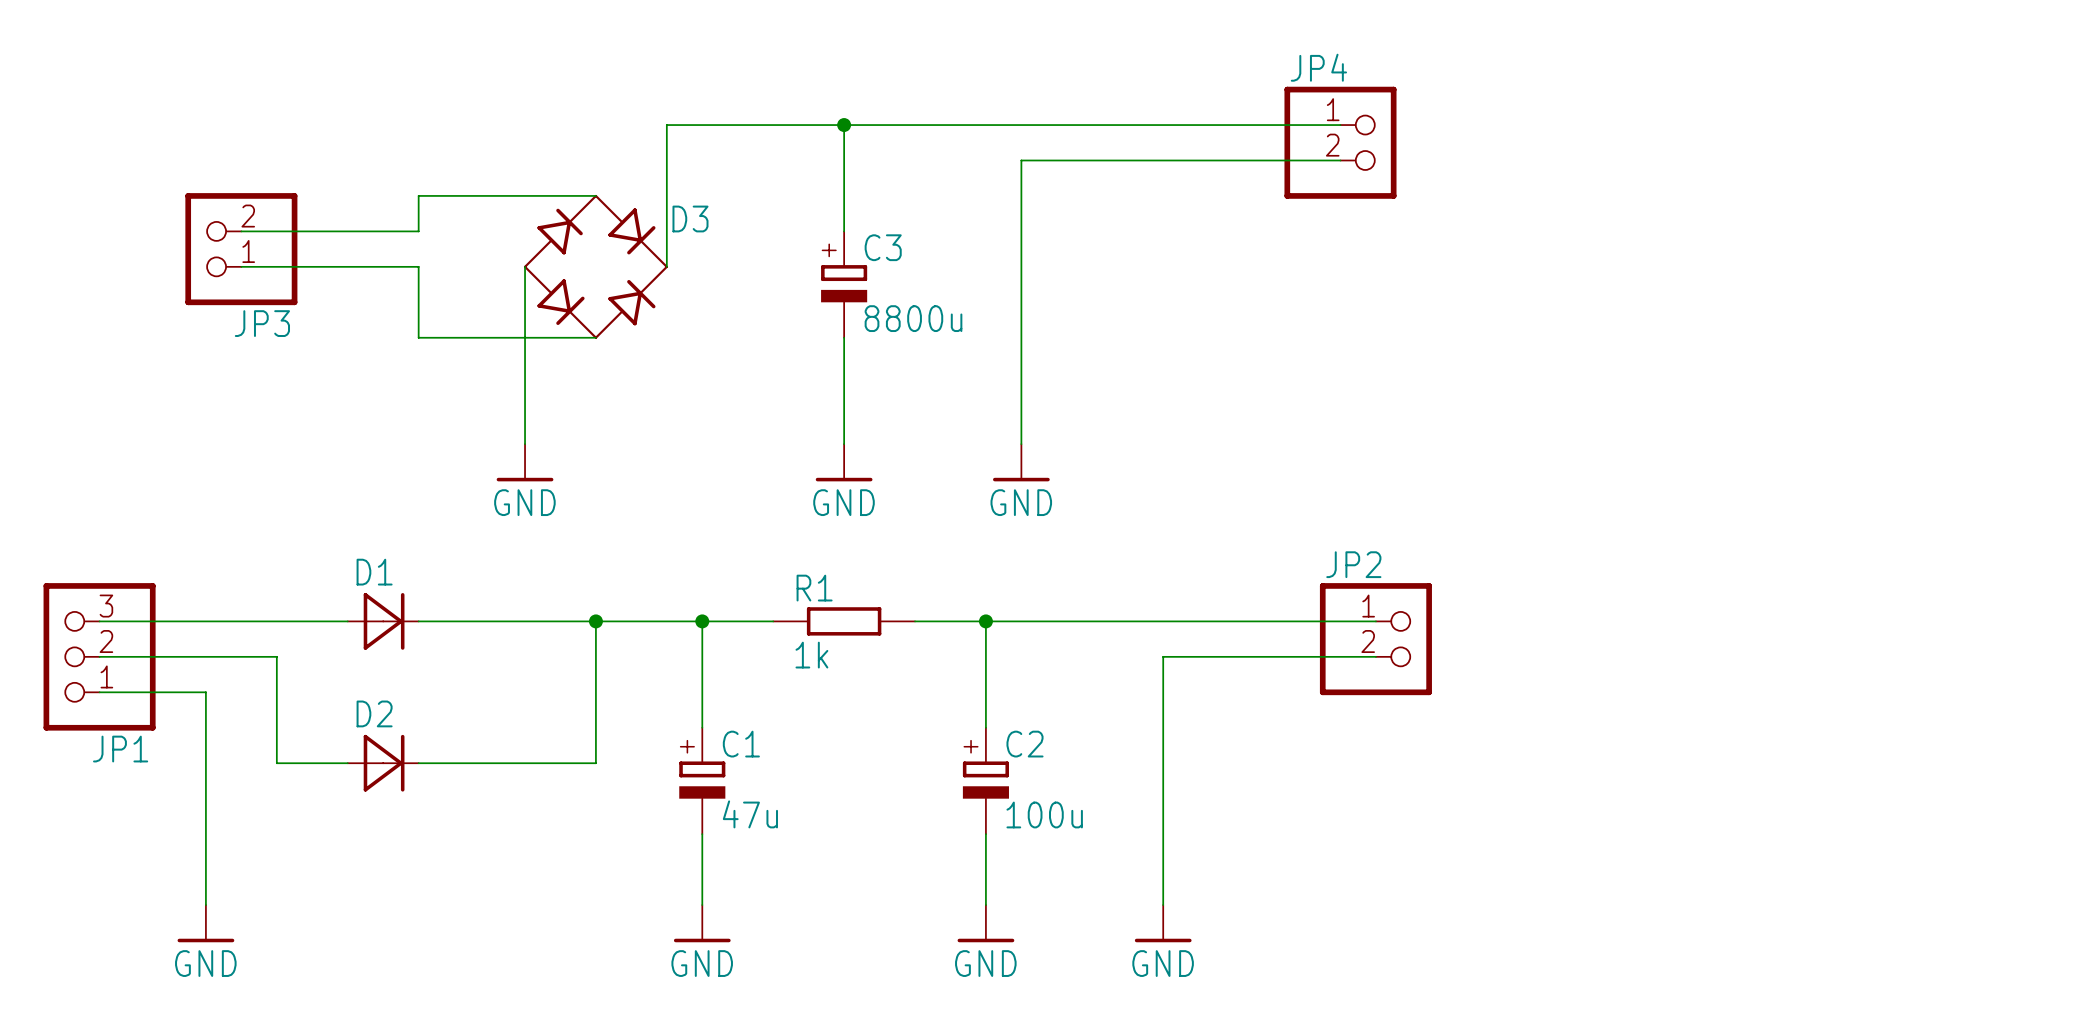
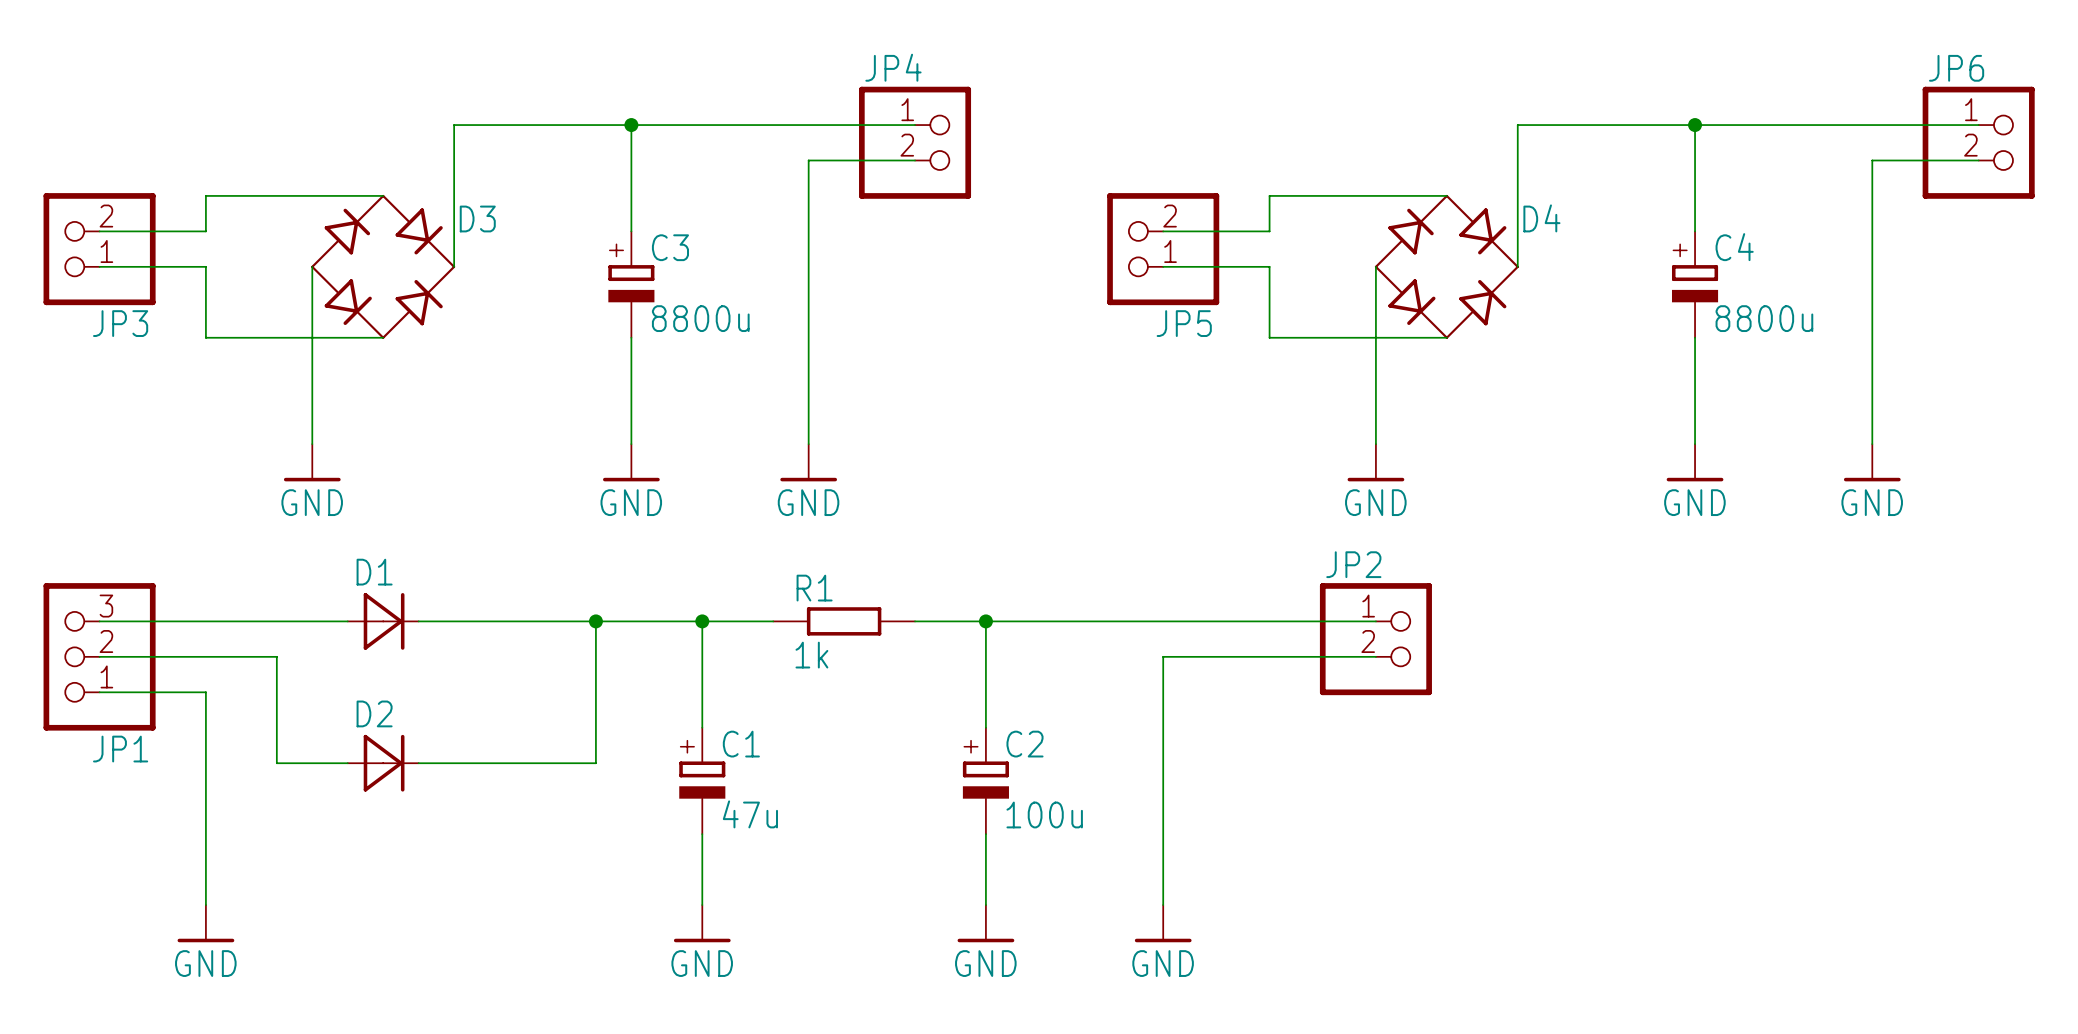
junction: none -> (631, 125)
wire: (666, 125) (666, 266) -> (666, 125) (454, 125) (454, 266)
wire: (844, 125) (844, 231) -> (631, 125) (631, 231)
junction: (844, 125) -> none
wire: (915, 125) (1340, 125) -> none
wire: none -> (1695, 125) (1695, 231)
junction: none -> (1695, 125)
wire: none -> (1978, 125) (1517, 125) (1517, 266)
JP4 position: (1340, 142) -> (915, 142)
JP6: none -> (1978, 142)
wire: none -> (915, 160) (808, 160) (808, 444)
wire: (1340, 160) (1021, 160) (1021, 444) -> none
wire: none -> (1978, 160) (1872, 160) (1872, 444)
wire: none -> (383, 195) (205, 195) (205, 231) (99, 231)
wire: (595, 195) (418, 195) (418, 231) (241, 231) -> none
wire: none -> (1446, 195) (1269, 195) (1269, 231) (1163, 231)
JP3 position: (241, 249) -> (99, 249)
JP5: none -> (1163, 249)
wire: none -> (99, 266) (205, 266) (205, 337) (383, 337)
wire: (241, 266) (418, 266) (418, 337) (595, 337) -> none
wire: (525, 266) (525, 444) -> (312, 266) (312, 444)
D3 position: (595, 266) -> (383, 266)
wire: none -> (1163, 266) (1269, 266) (1269, 337) (1446, 337)
wire: none -> (1375, 266) (1375, 444)
D4: none -> (1446, 266)
C3 position: (844, 284) -> (631, 284)
C4: none -> 8800u (1695, 284)
wire: (844, 337) (844, 444) -> (631, 337) (631, 444)
wire: none -> (1695, 337) (1695, 444)
power symbol: none -> GND (312, 462)
power symbol: GND (525, 462) -> none
power symbol: none -> GND (631, 462)
power symbol position: GND (844, 462) -> GND (808, 462)
power symbol: GND (1021, 462) -> none
power symbol: none -> GND (1375, 462)
power symbol: none -> GND (1695, 462)
power symbol: none -> GND (1872, 462)

